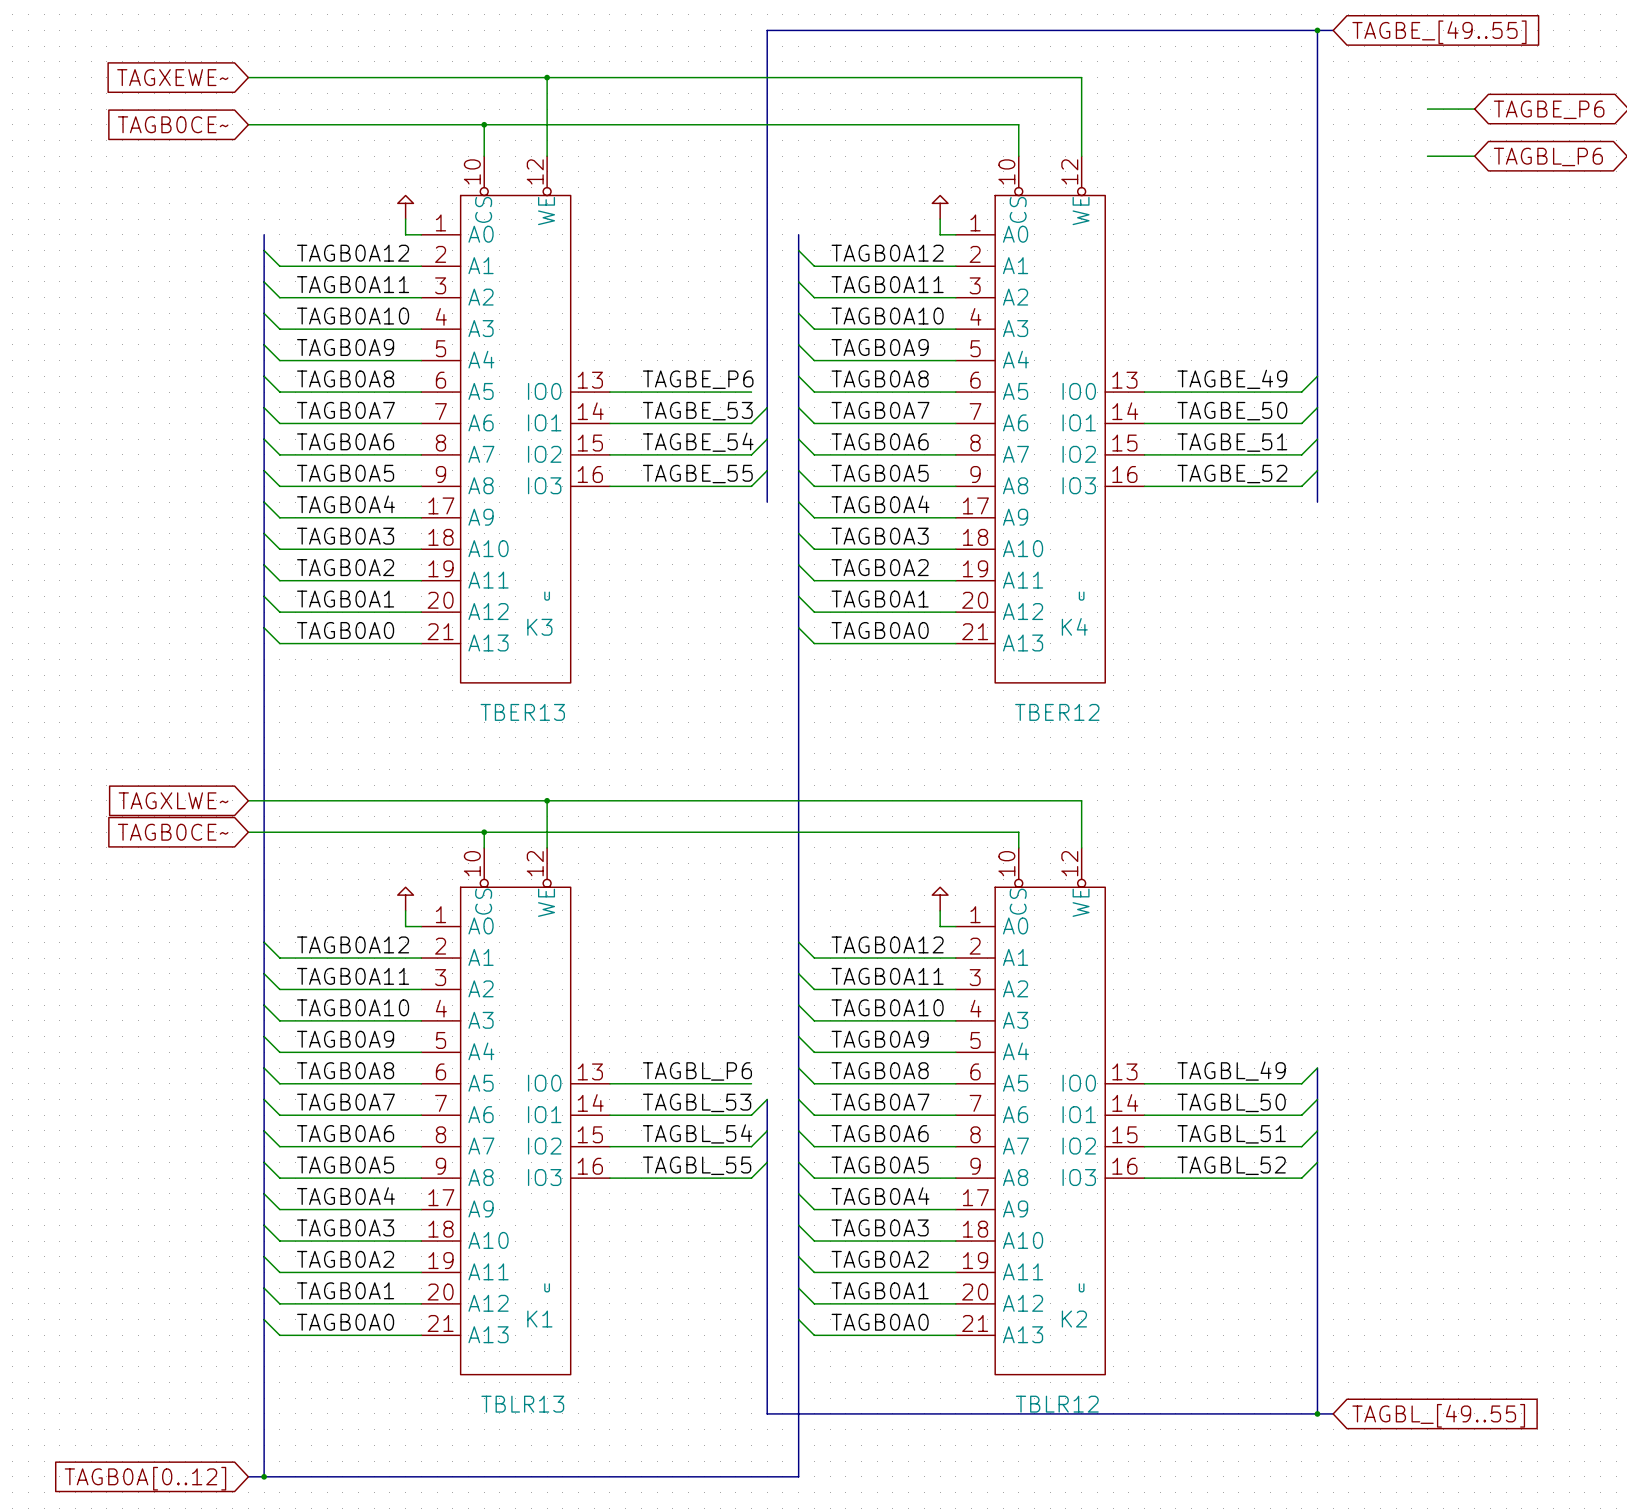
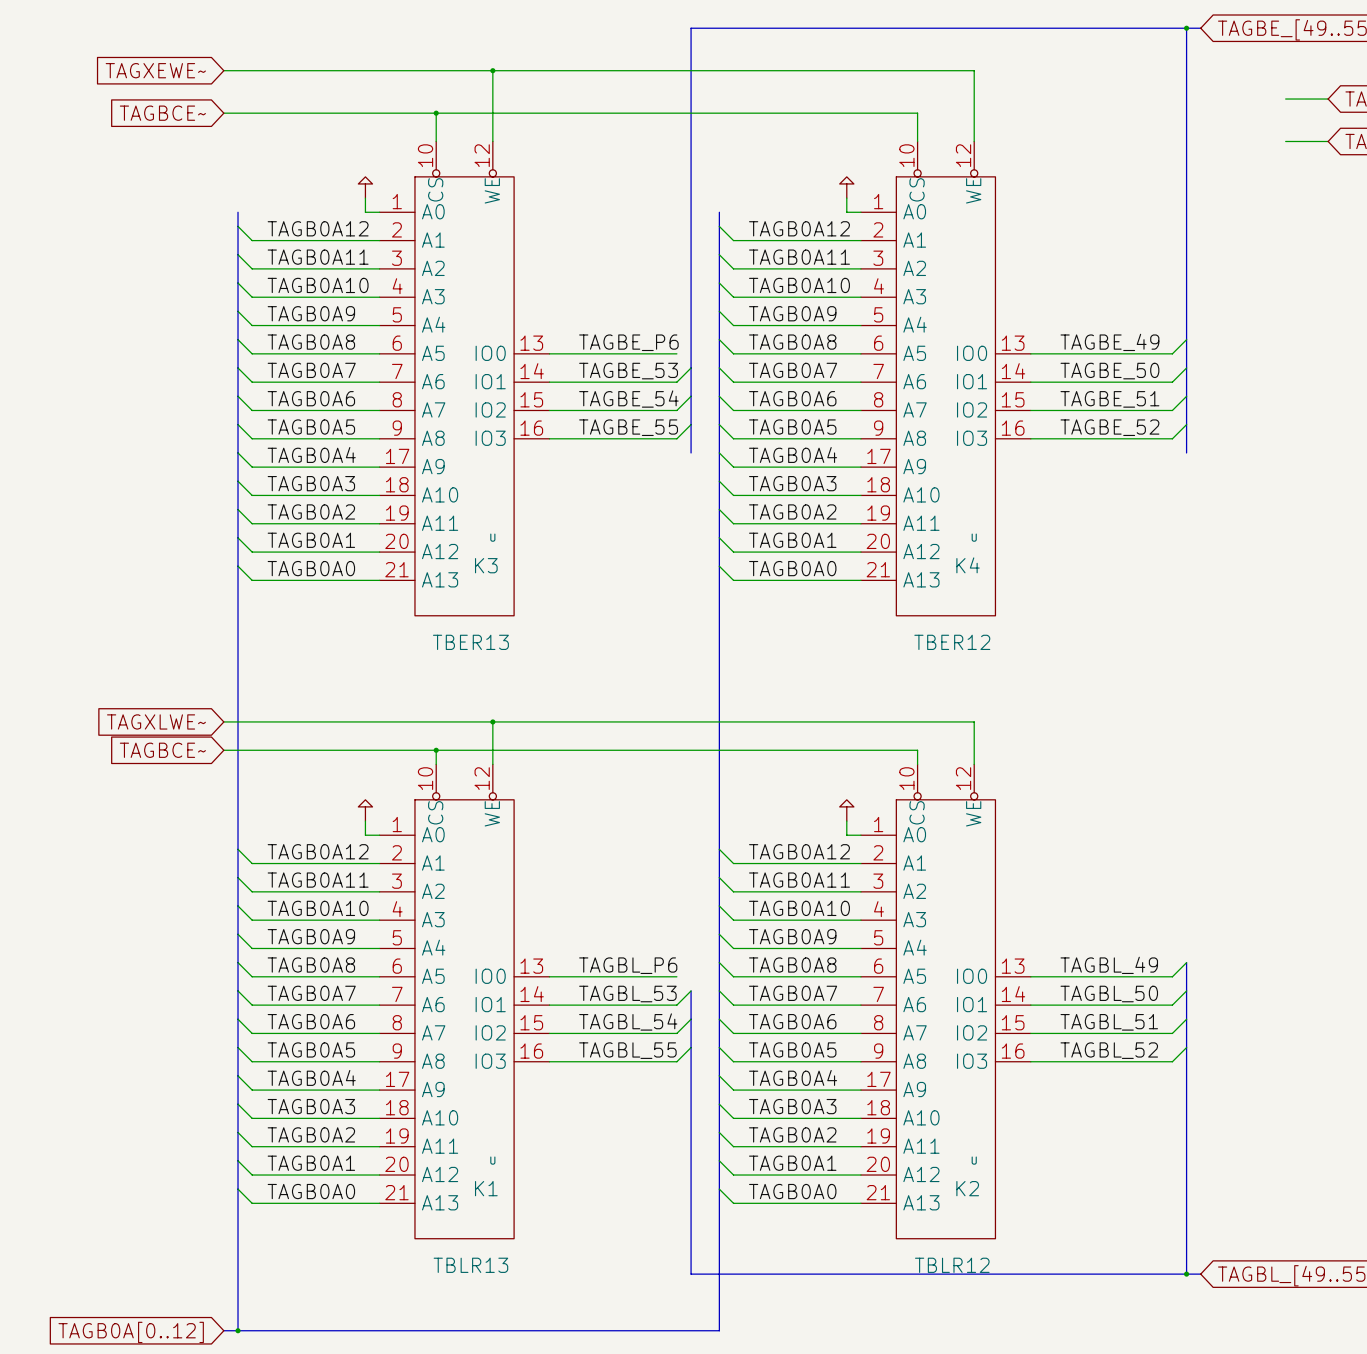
global label: TAGB0CE~ (173, 124) -> TAGBCE~ (162, 113)
global label: TAGB0CE~ (173, 832) -> TAGBCE~ (162, 750)

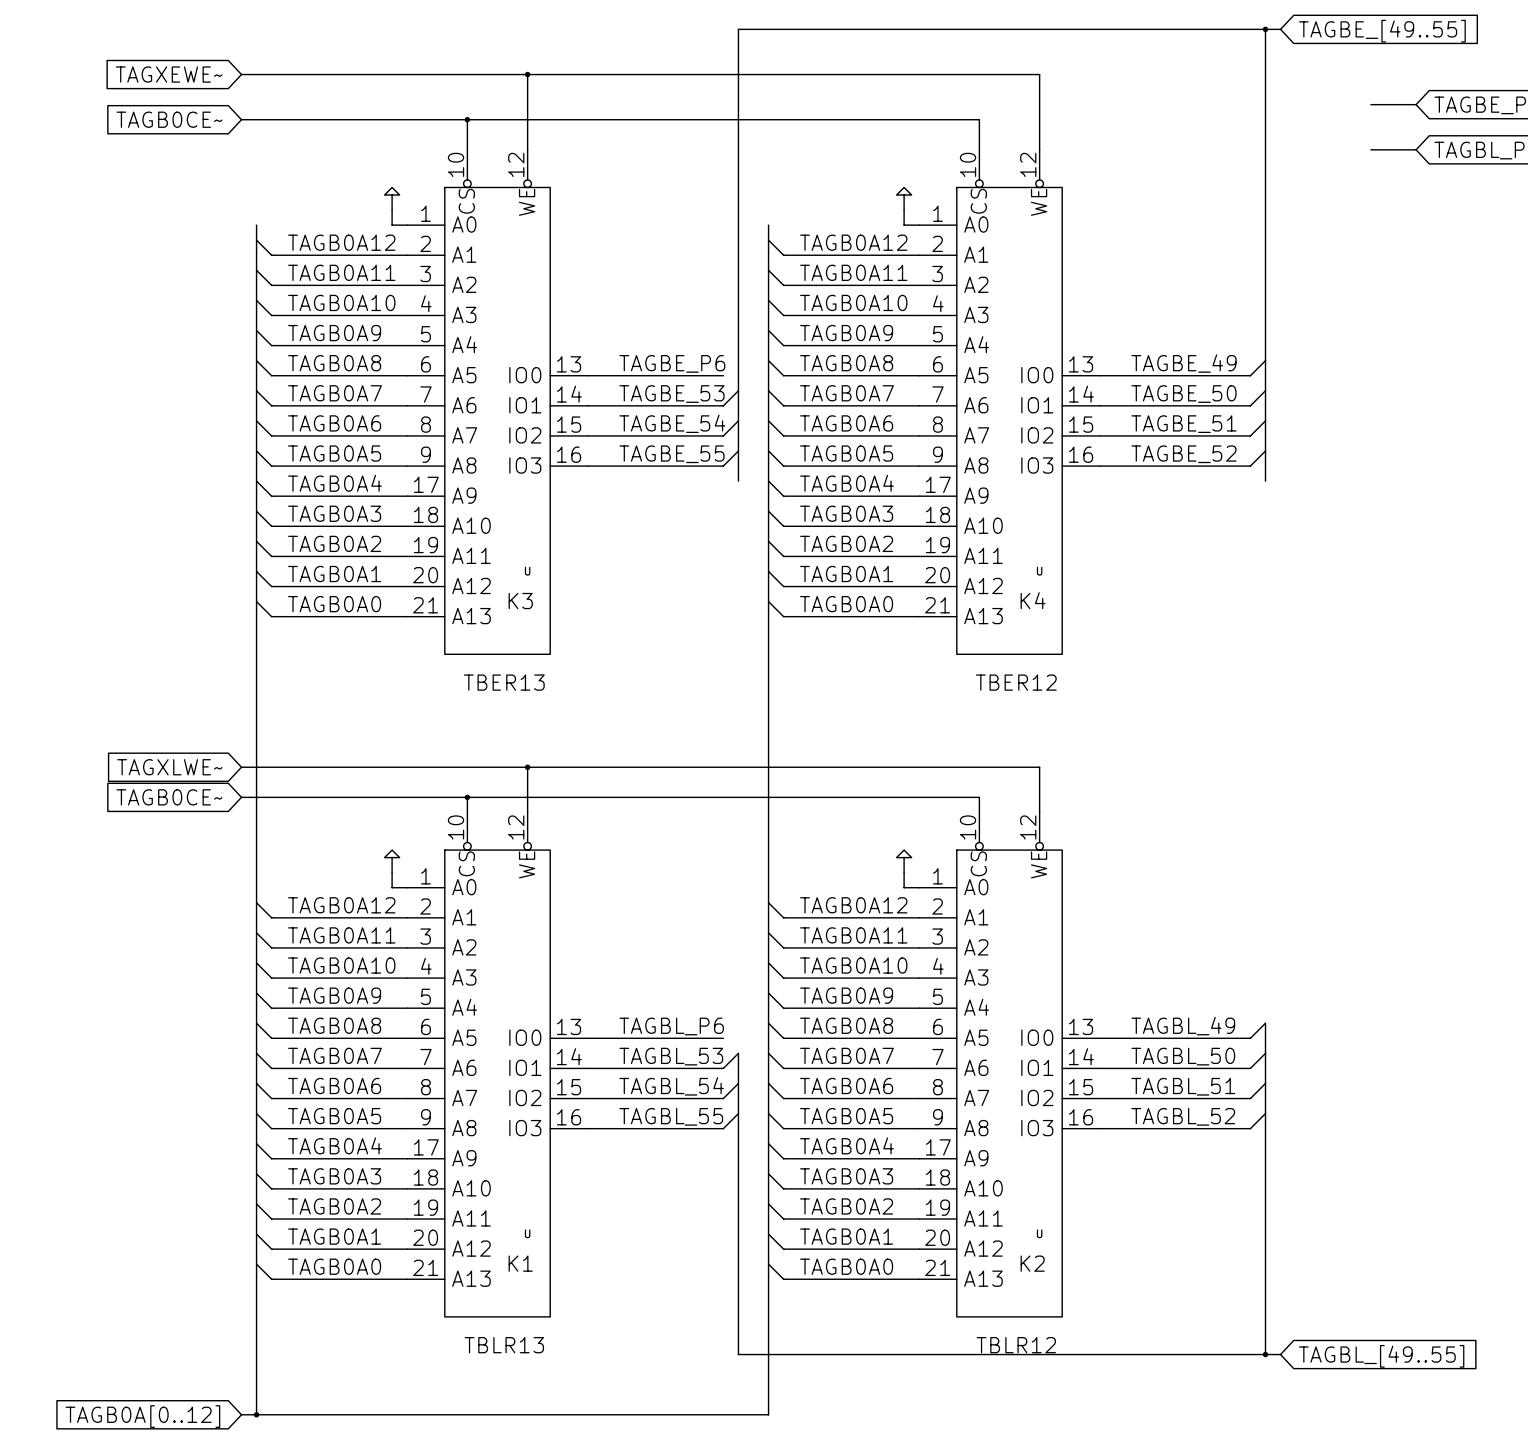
global label: TAGBCE~ (162, 113) -> TAGB0CE~ (169, 119)
global label: TAGBCE~ (162, 750) -> TAGB0CE~ (169, 797)

